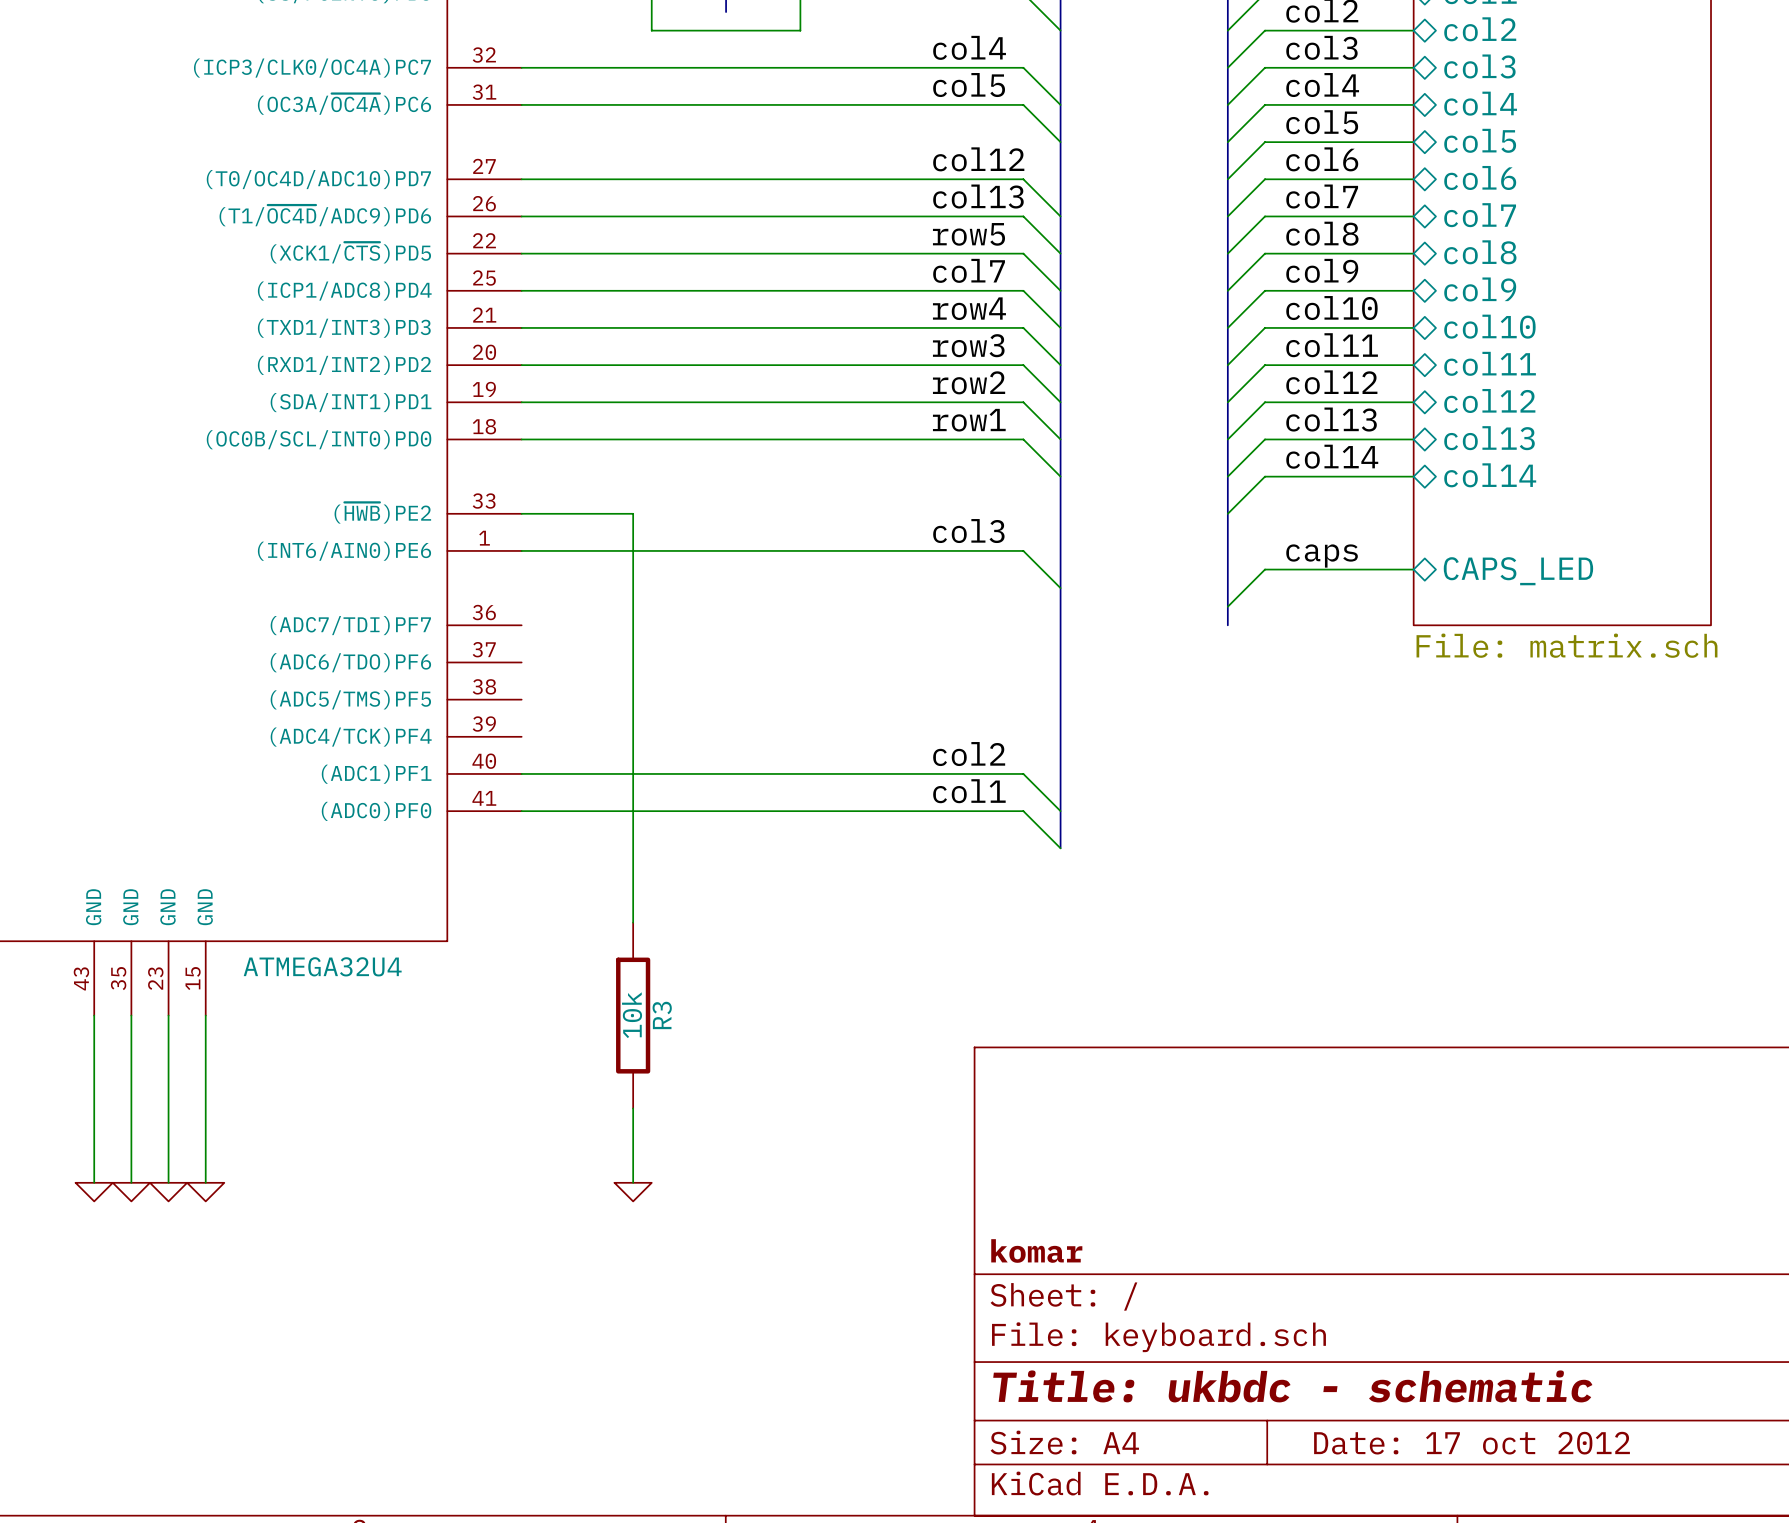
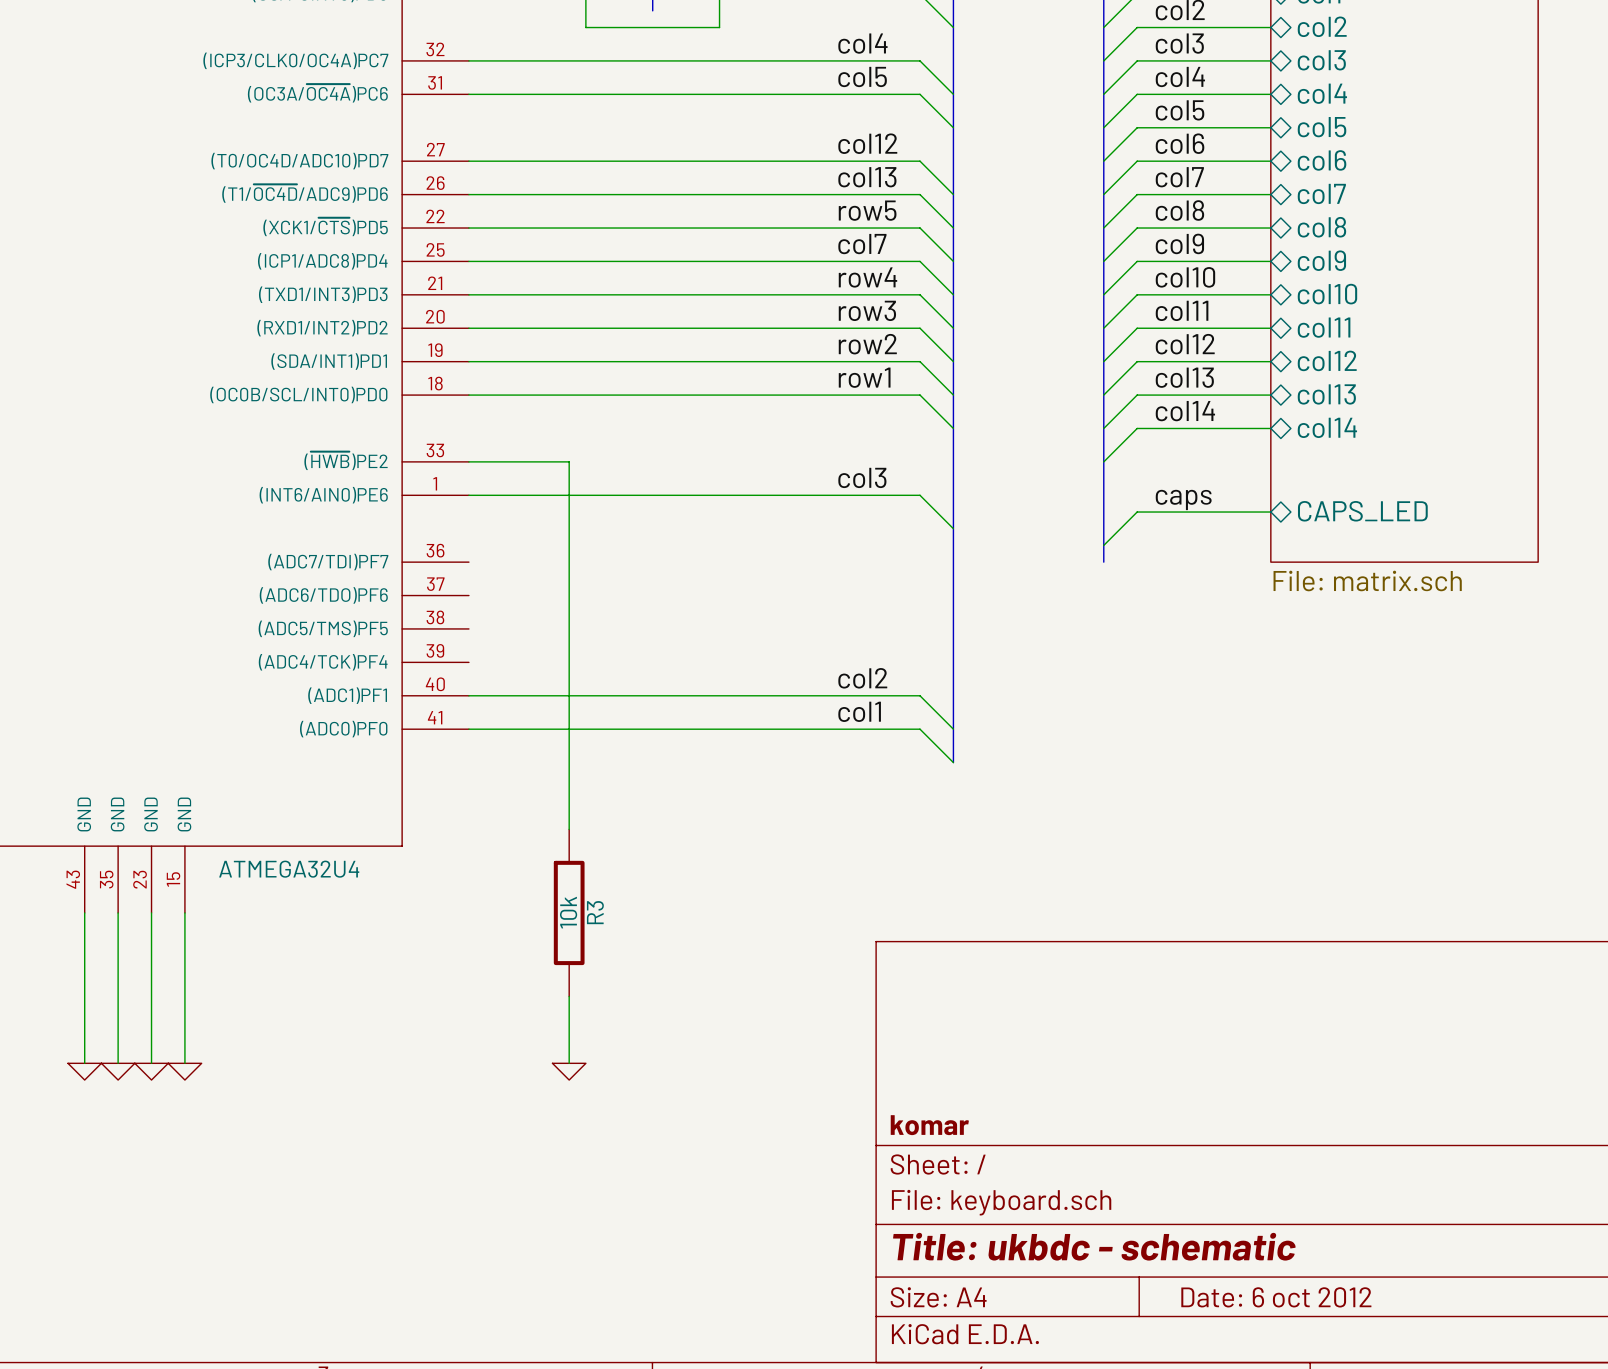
title block: Date: 17 oct 2012 (1472, 1443) -> Date: 6 oct 2012 (1276, 1297)

